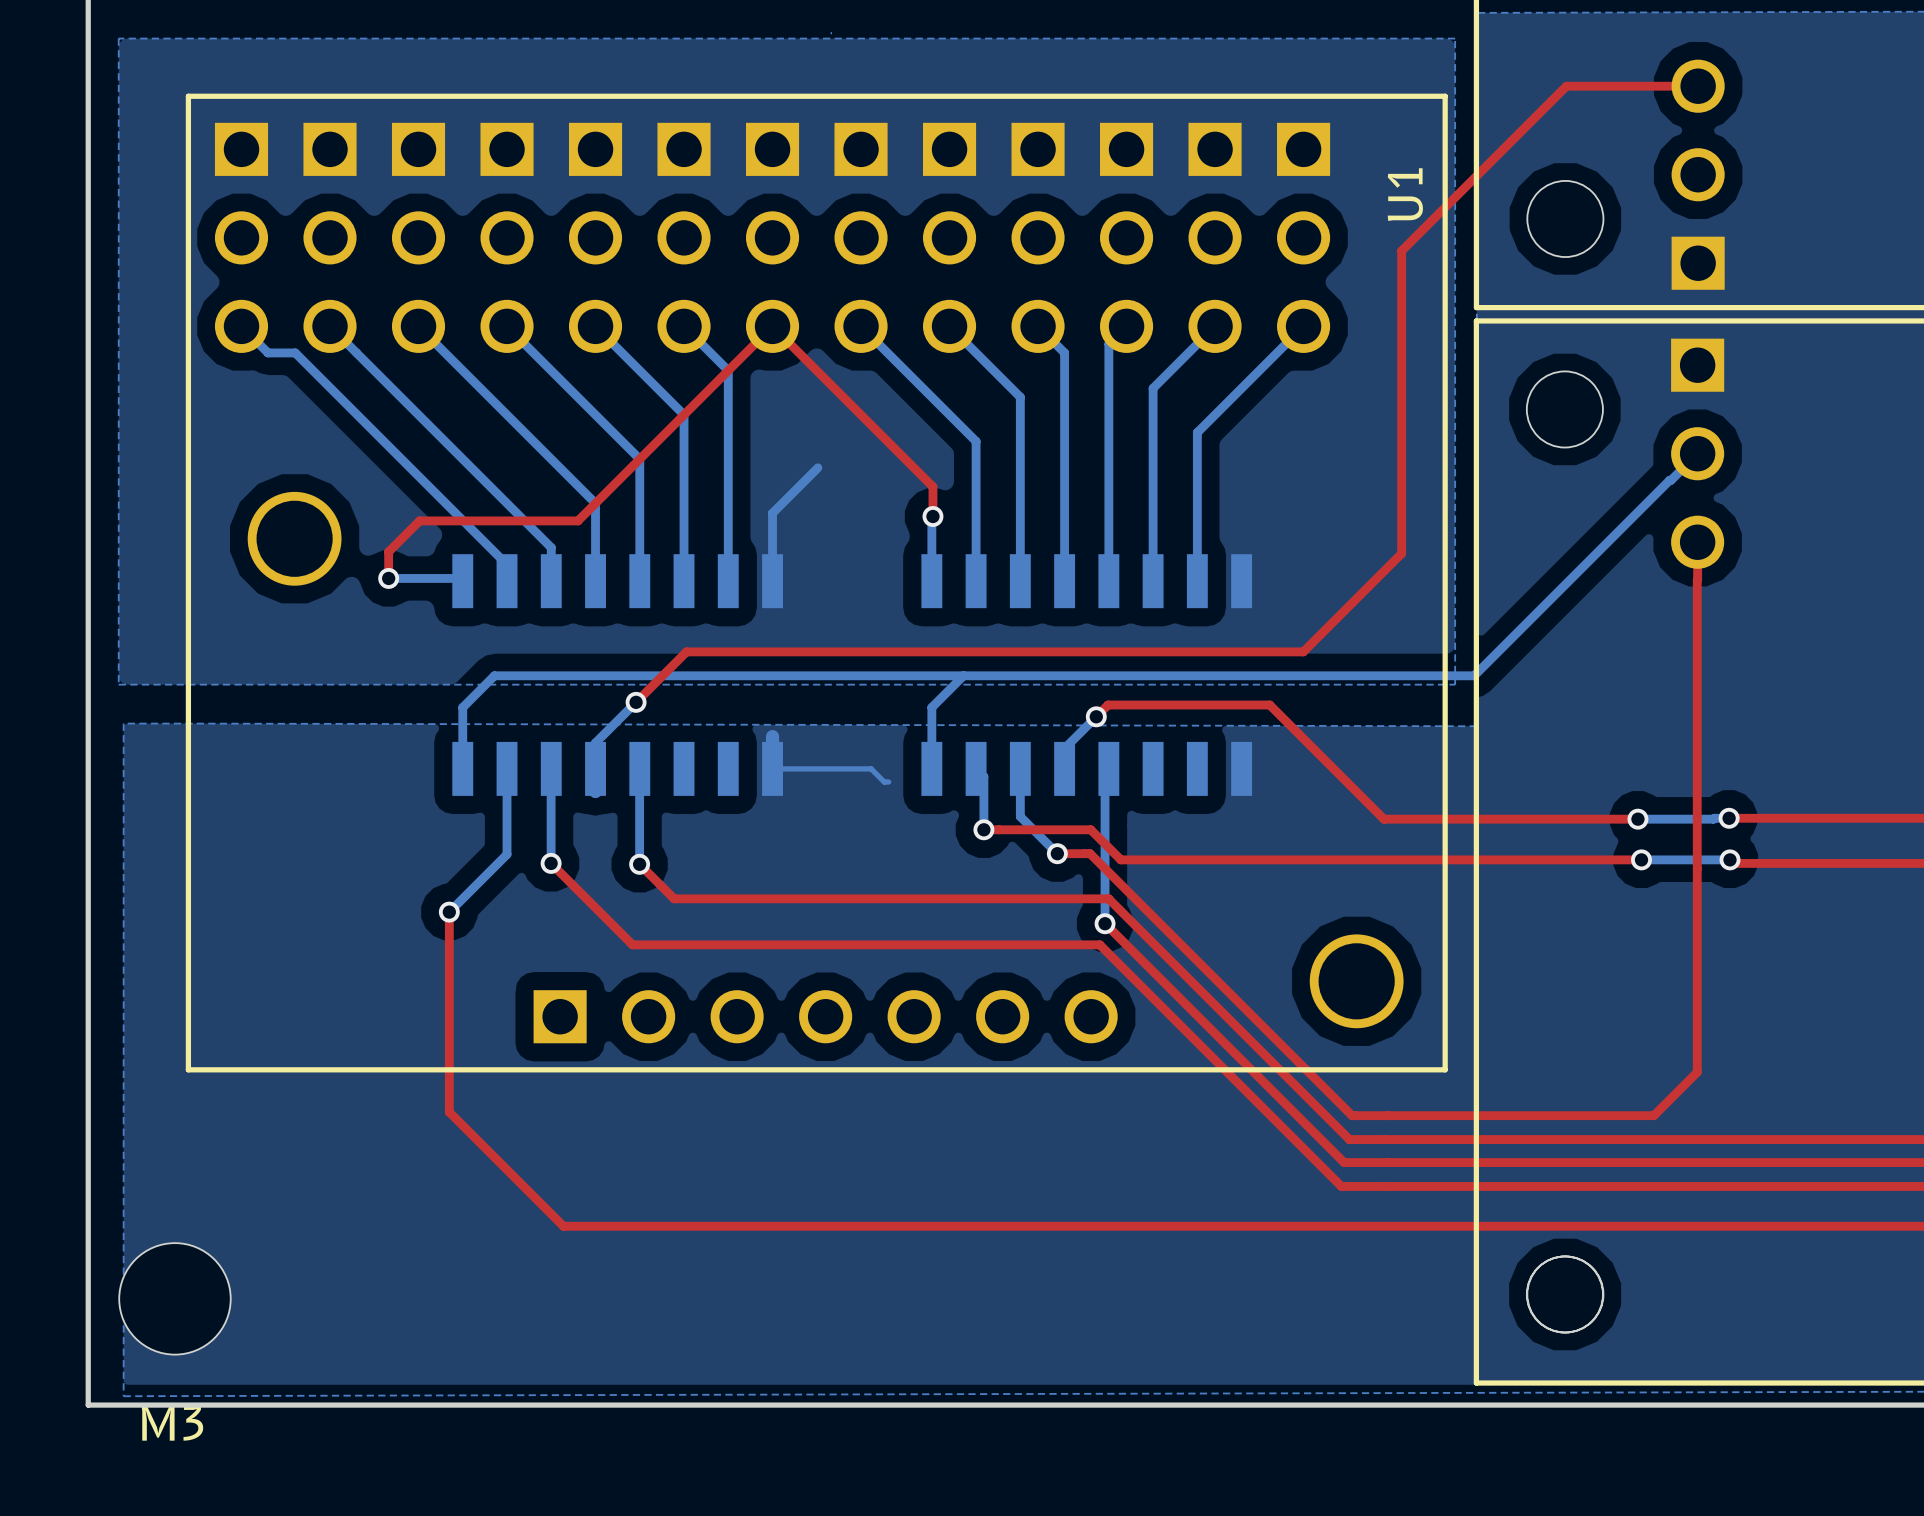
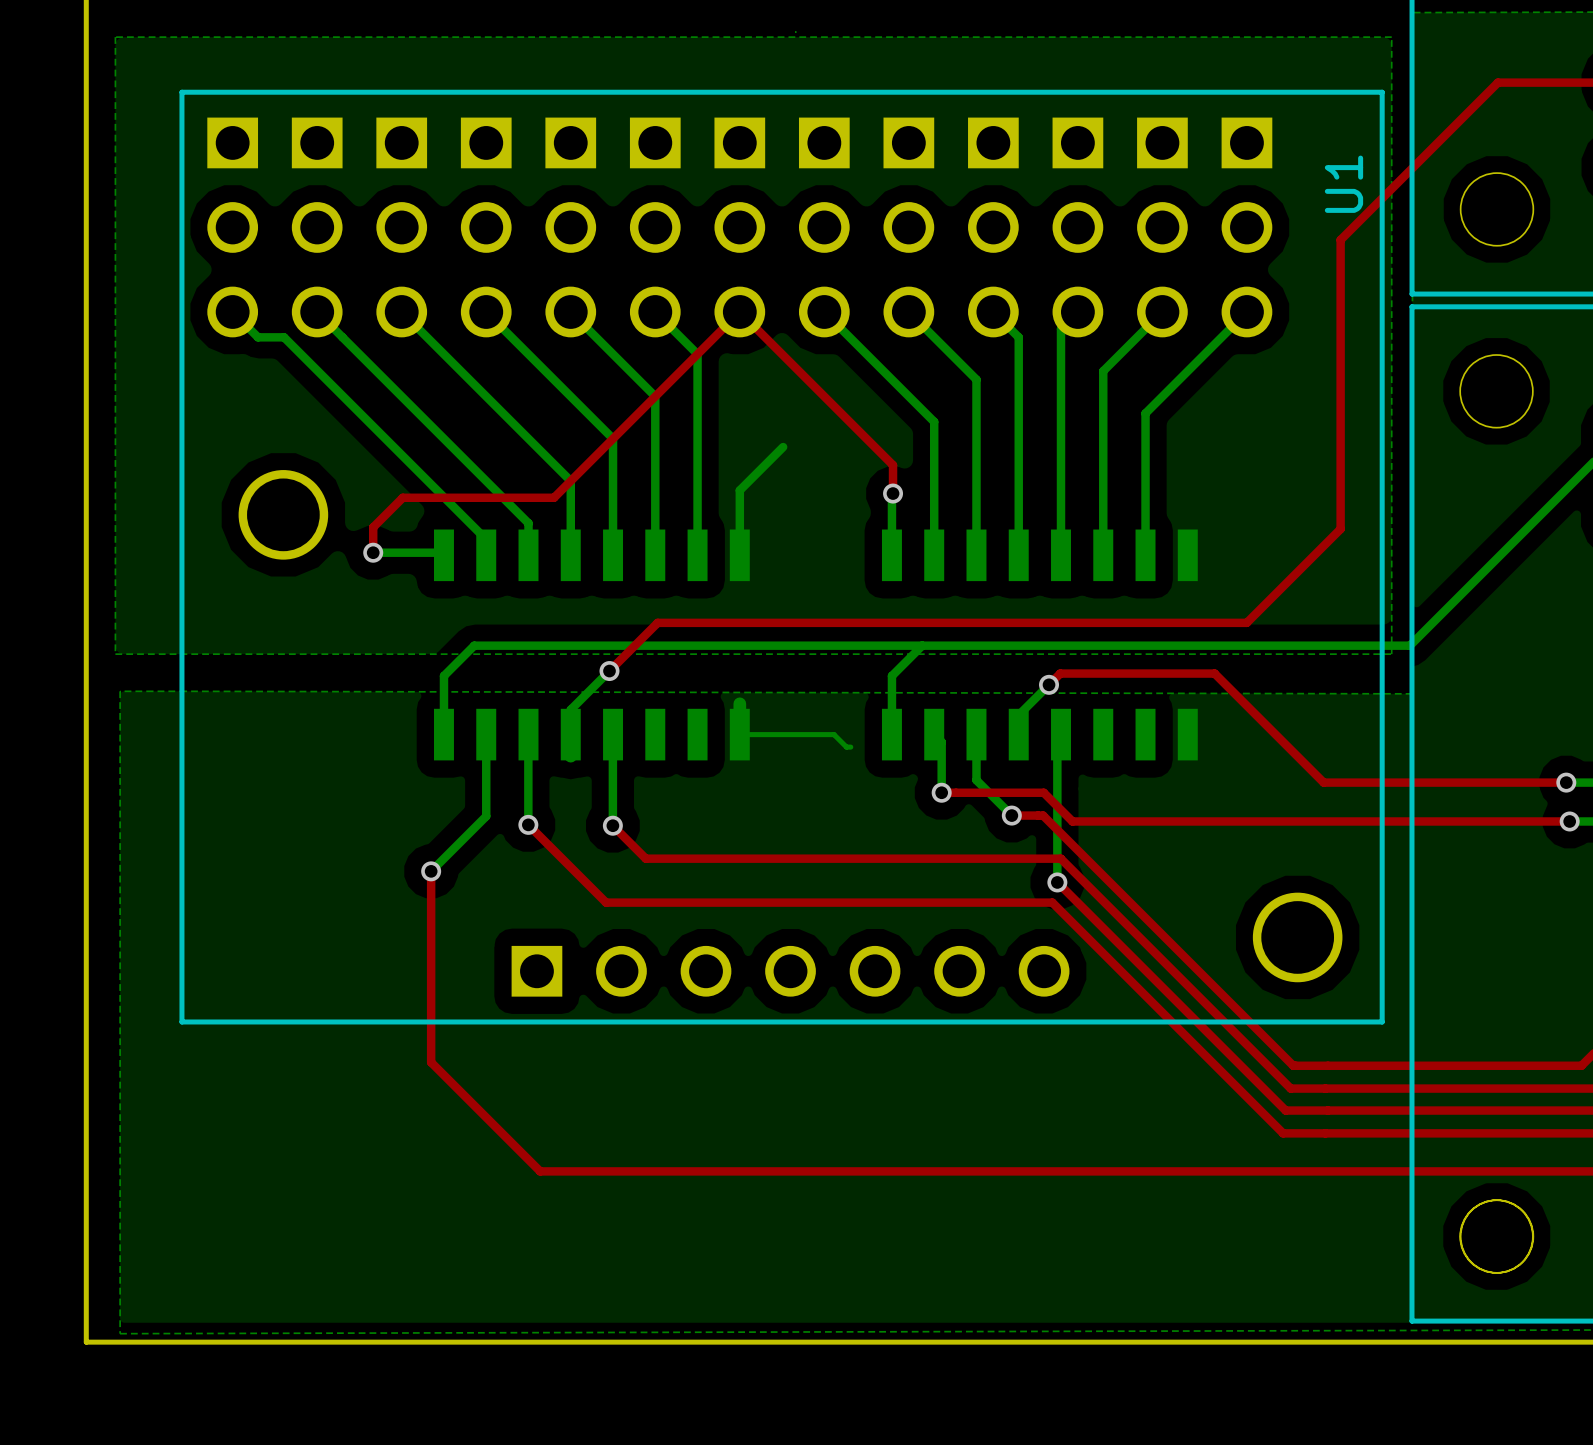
M3: (174, 1298) -> none

